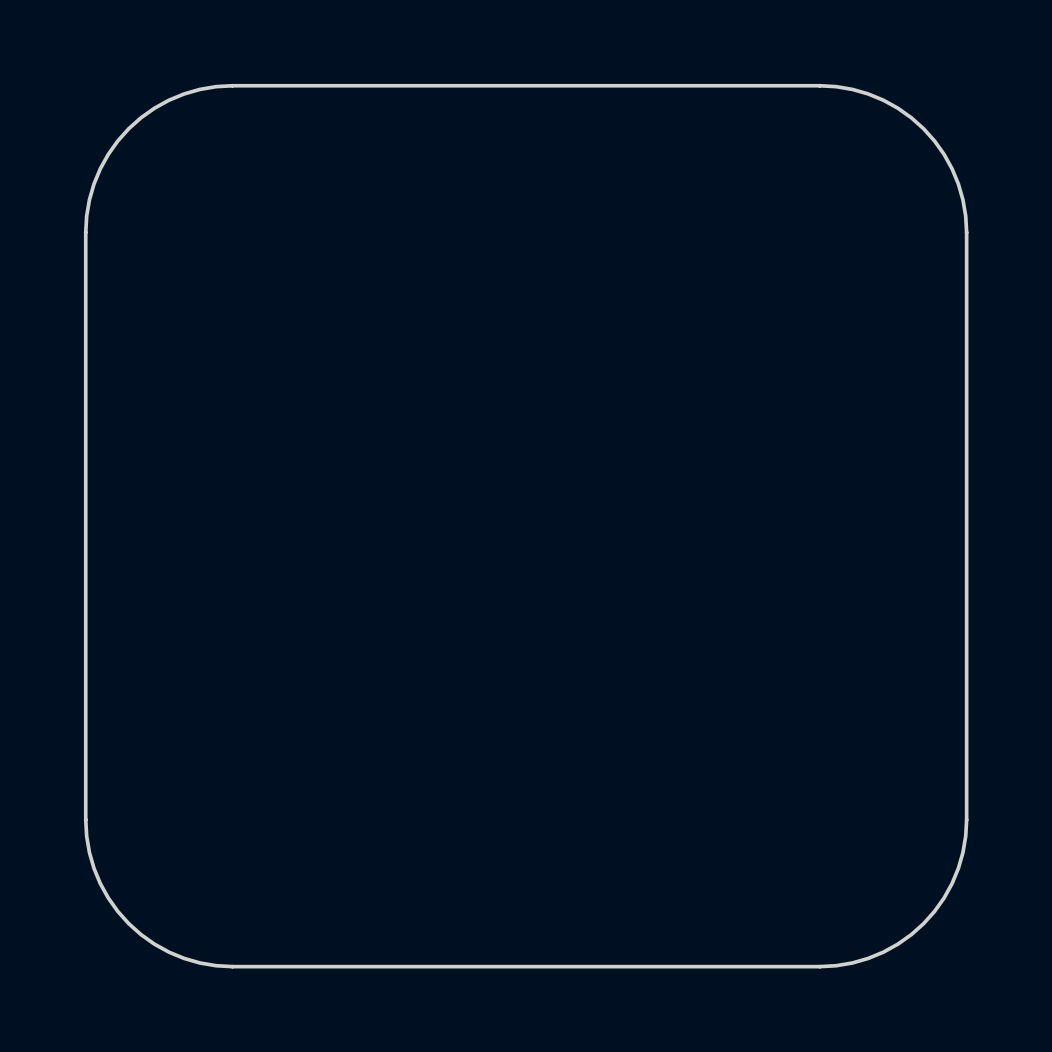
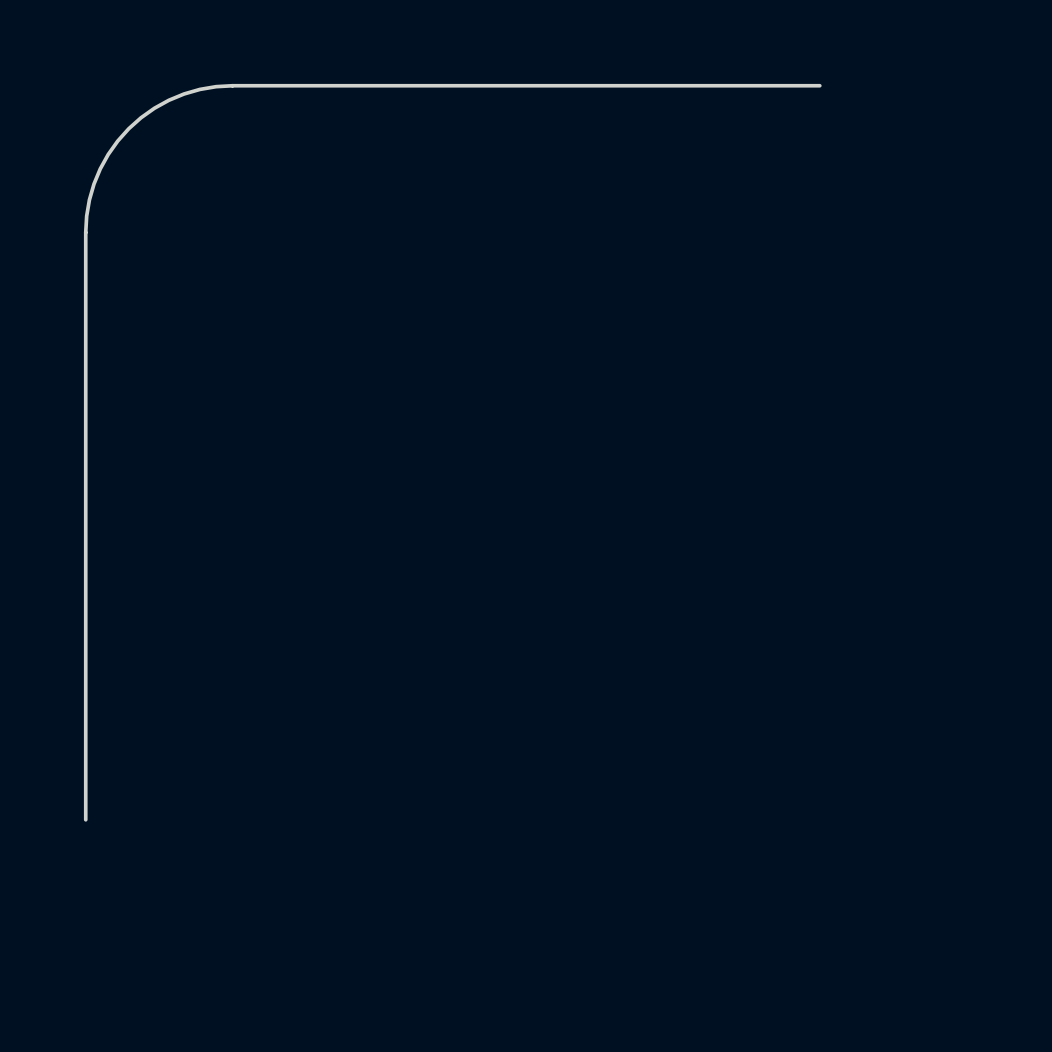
board edge: (819, 85) (852, 89) (868, 93) (883, 100) (911, 117) (934, 141) (952, 168) (958, 184) (965, 216) (965, 836) (962, 852) (952, 883) (944, 897) (923, 923) (897, 944) (883, 952) (868, 958) (836, 965) (216, 965) (184, 958) (168, 952) (141, 934) (128, 923) (108, 897) (100, 883) (89, 852) (85, 819) -> none

